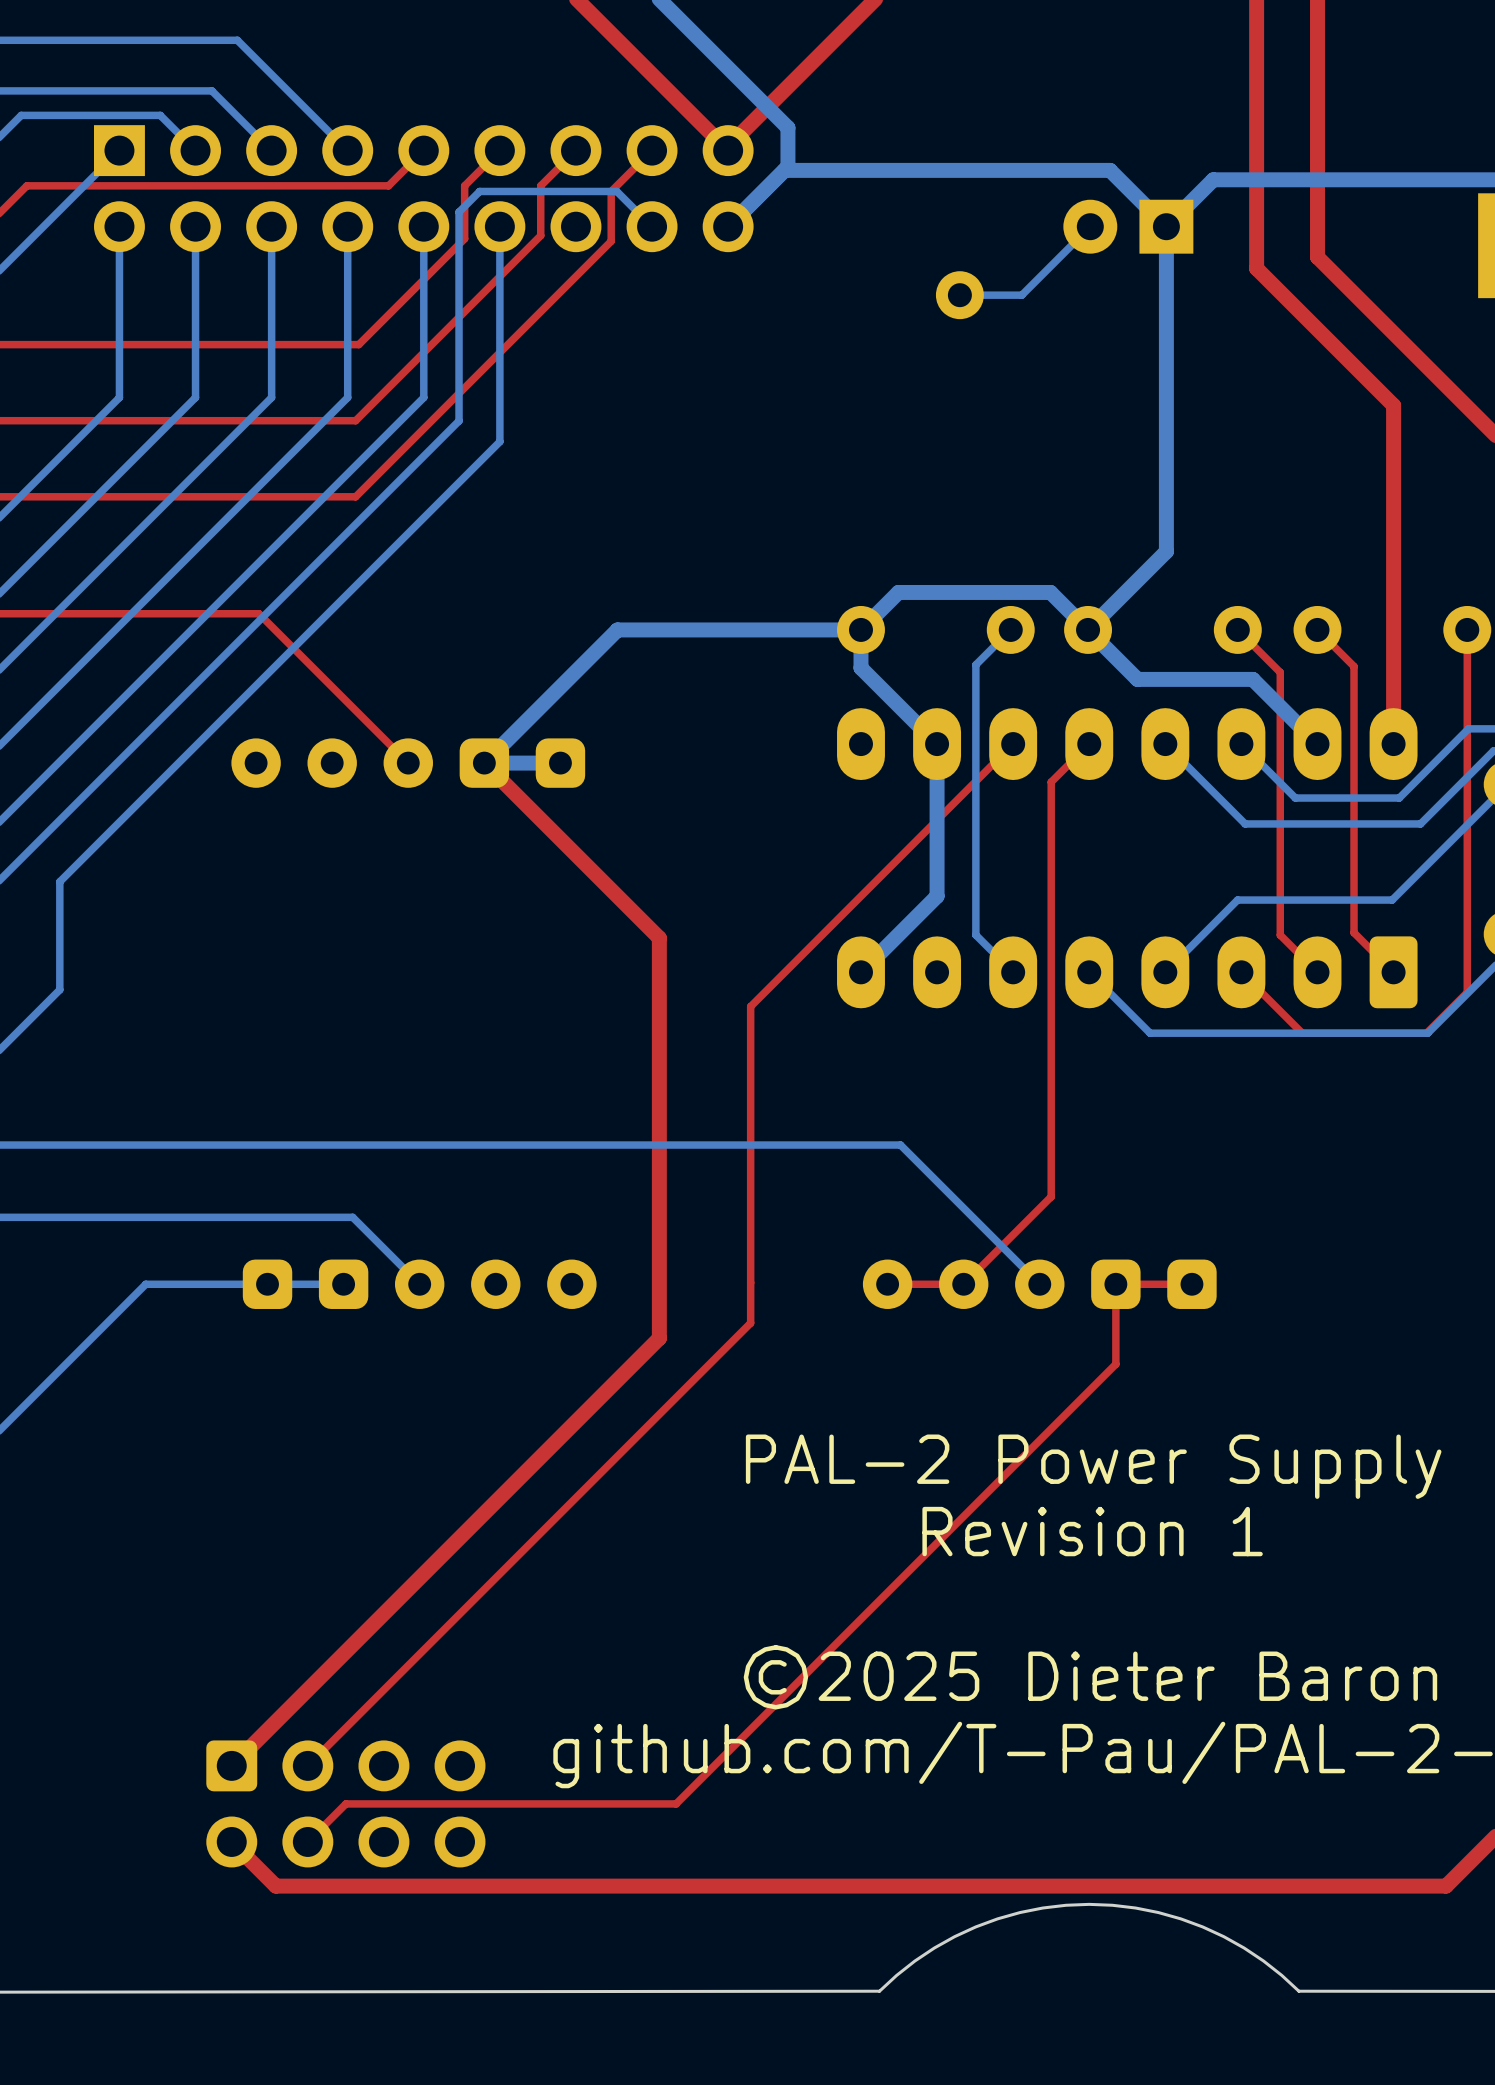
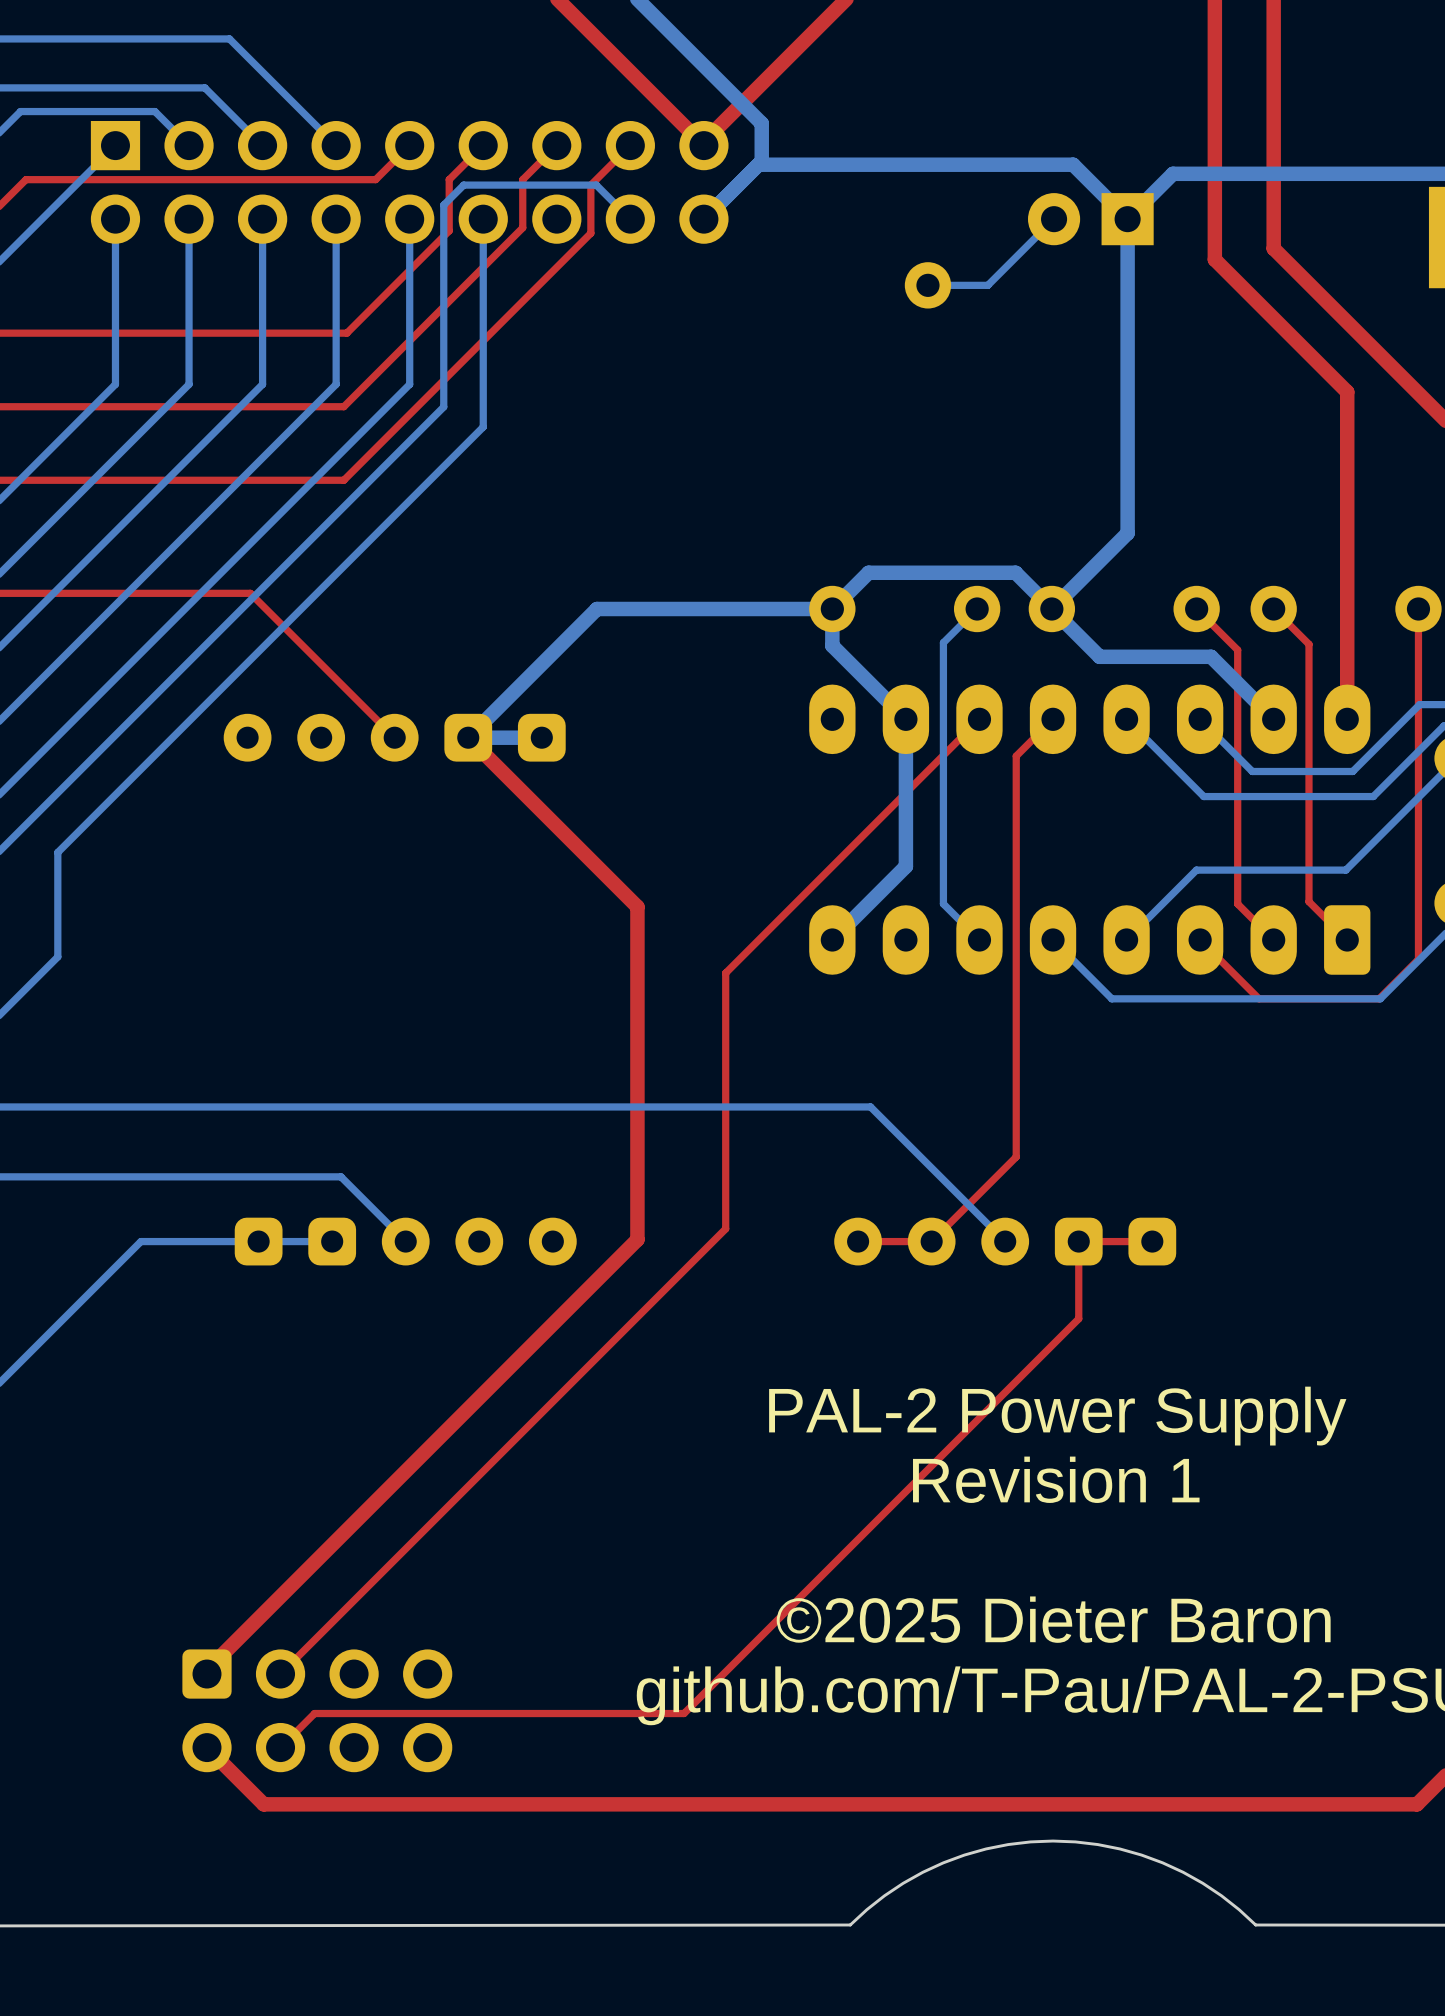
top track: (750, 1271) (750, 1323) (307, 1765) -> (725, 1228) (280, 1674)
top track: (659, 1282) (659, 1338) (231, 1765) -> (637, 1239) (206, 1670) (206, 1674)
top track: (707, 1772) (676, 1803) (345, 1803) (307, 1841) -> (684, 1713) (314, 1713) (280, 1747)
part position: (345, 1803) -> (317, 1710)
top track: (231, 1841) (275, 1886) (1446, 1886) (1465, 1866) -> (206, 1747) (263, 1804) (1417, 1804)

